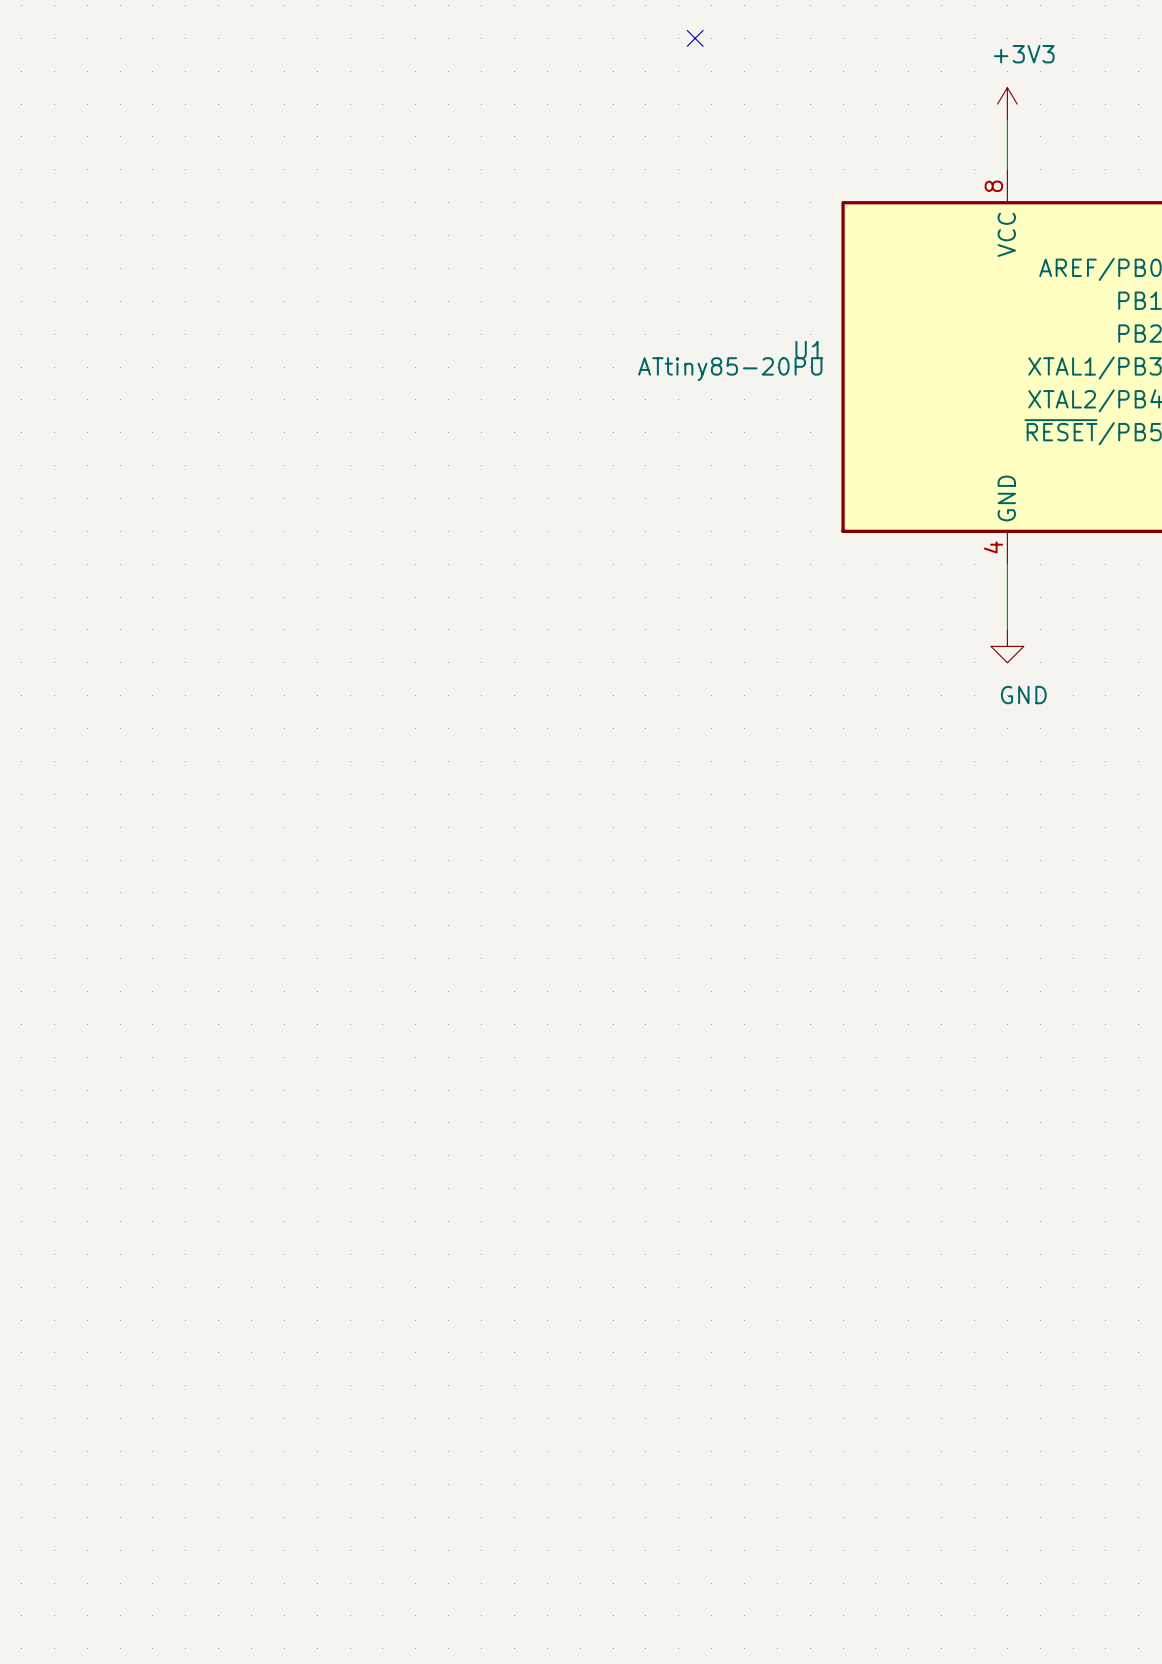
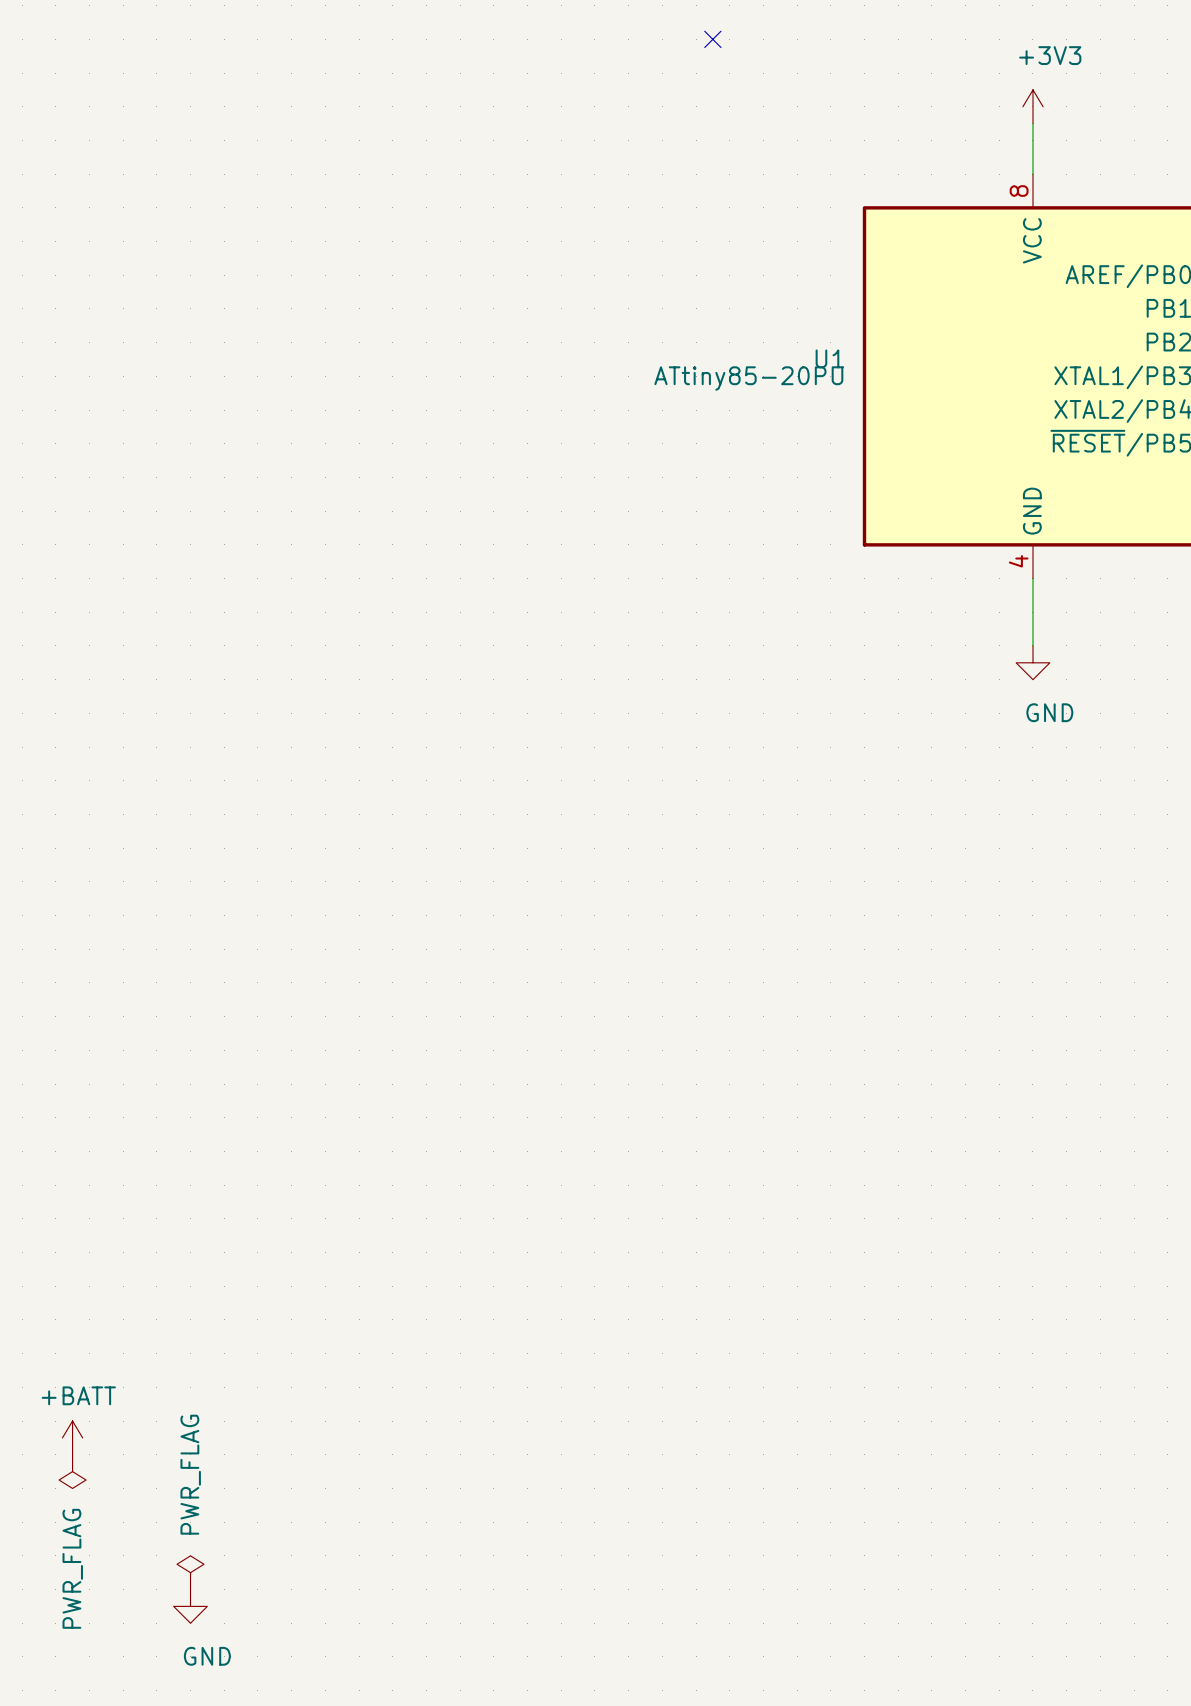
power symbol: none -> +BATT (72, 1437)
power symbol: none -> PWR_FLAG (72, 1471)
power symbol: none -> PWR_FLAG (190, 1572)
power symbol: none -> GND (190, 1606)

